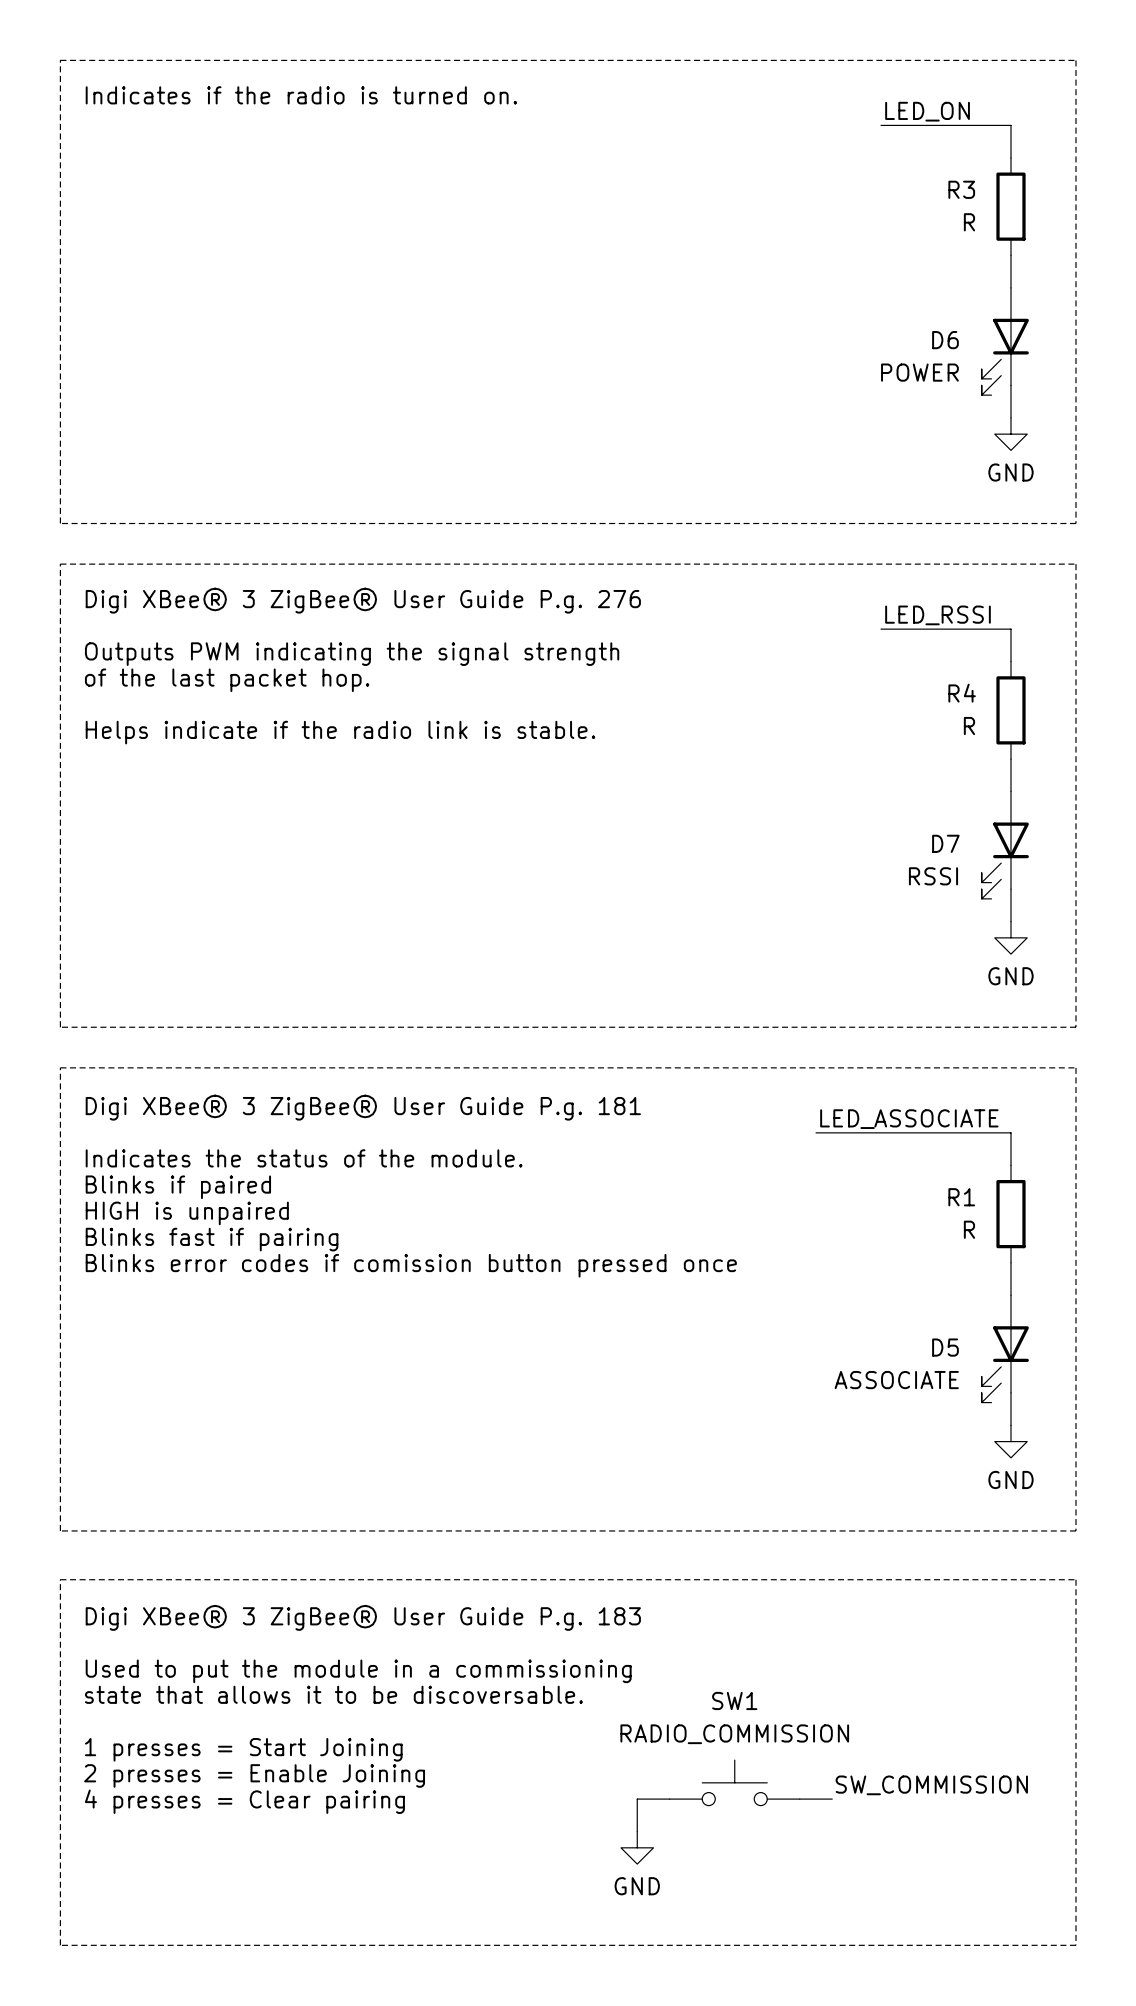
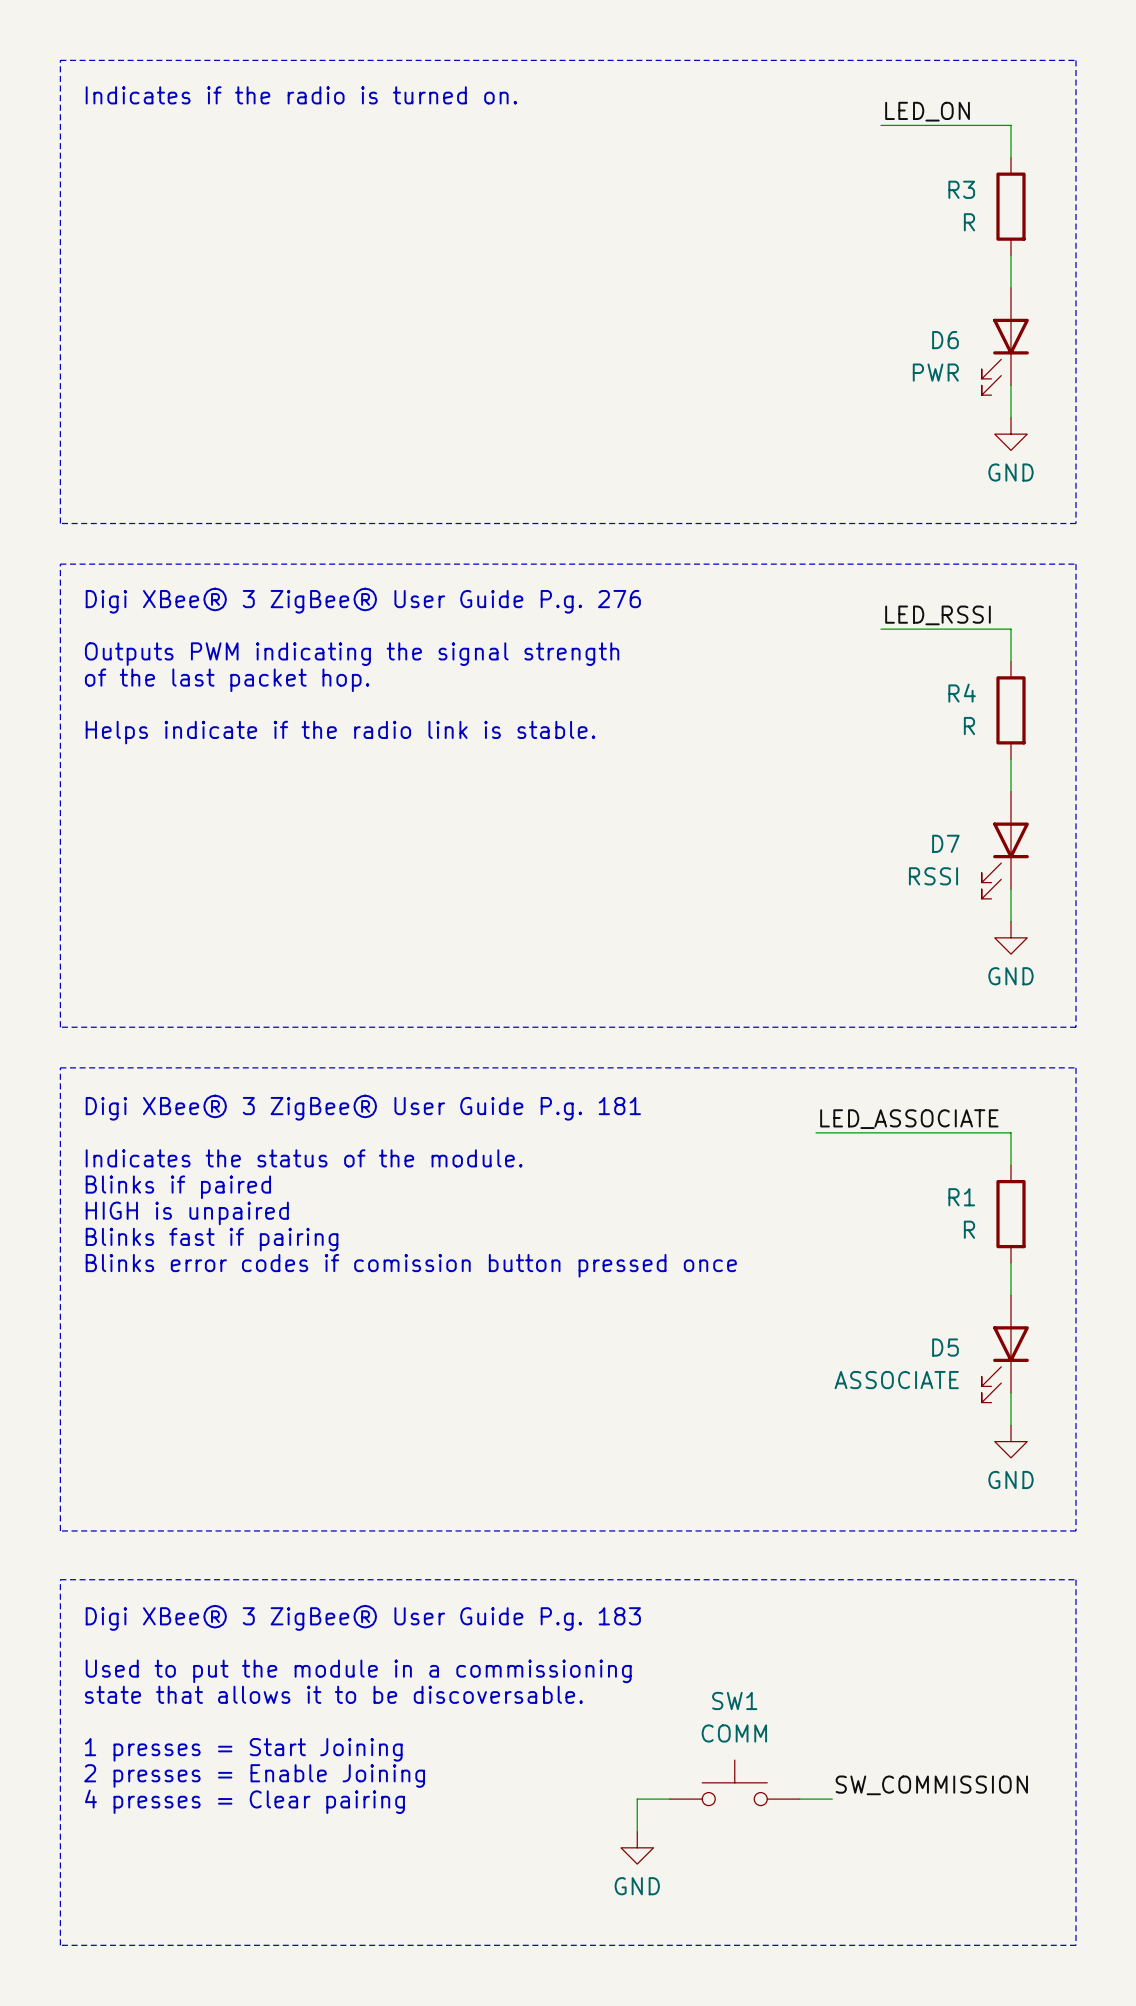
D6 value: POWER (919, 372) -> PWR (935, 372)
SW1 value: RADIO_COMMISSION (734, 1734) -> COMM (734, 1733)

